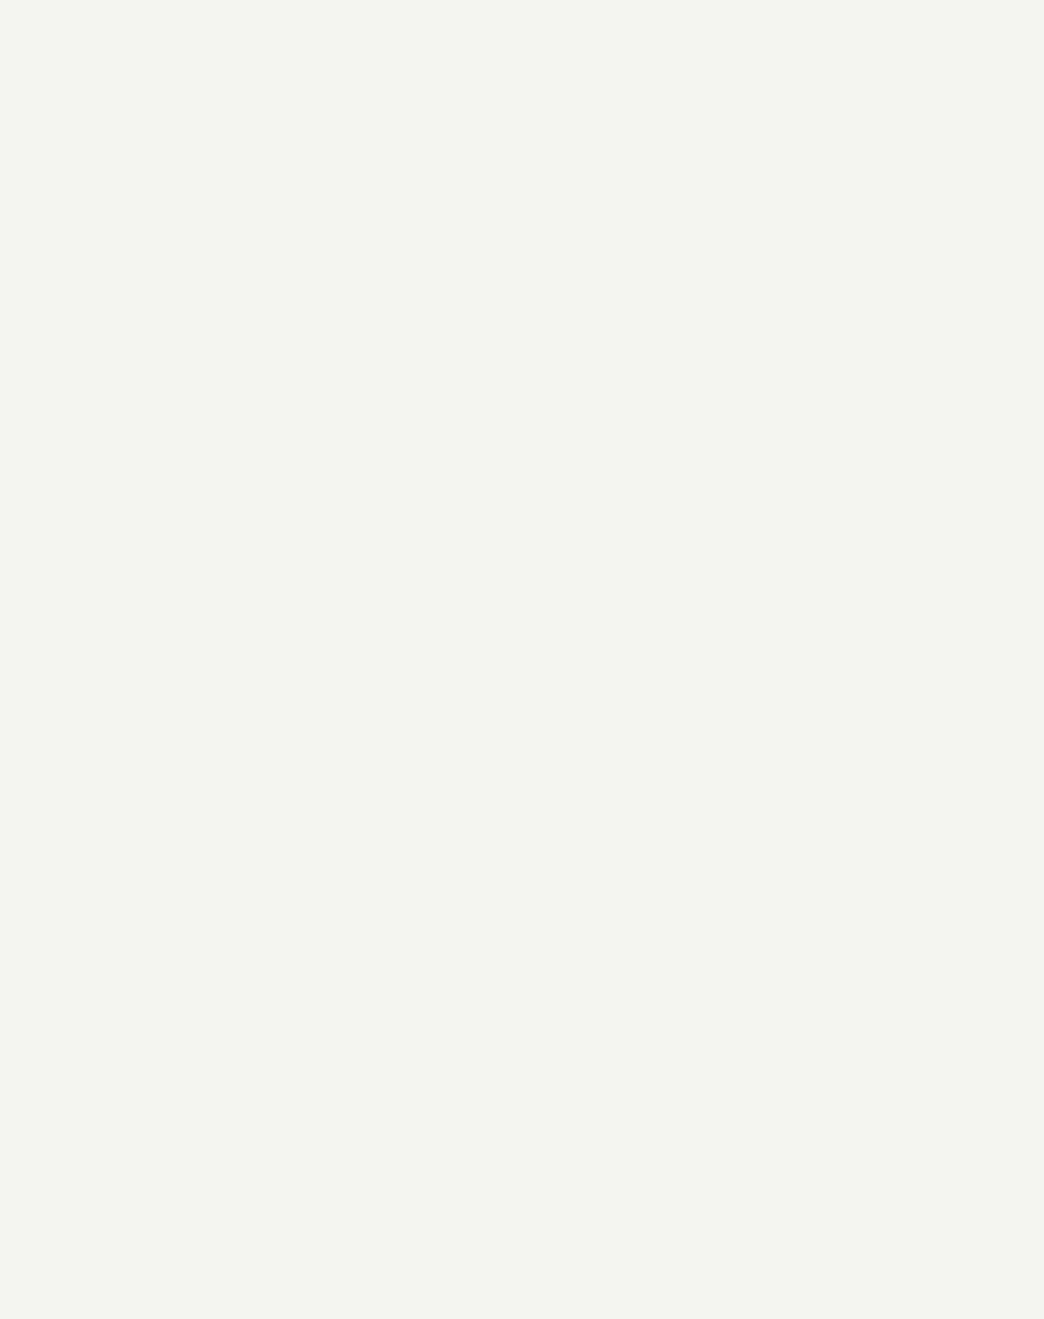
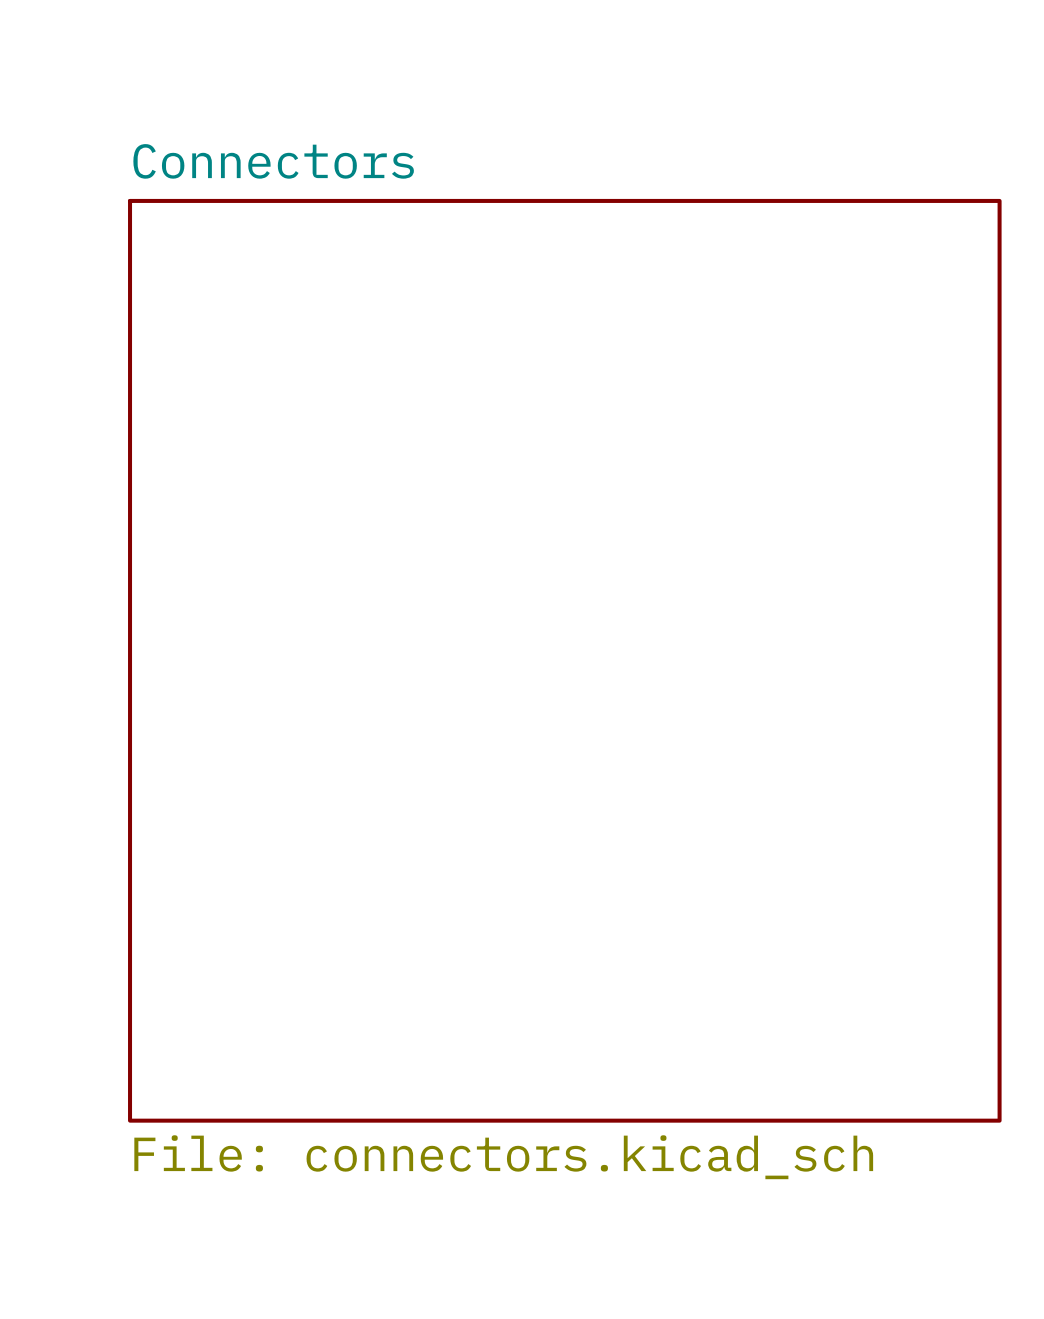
sheet Connectors: none -> File: connectors.kicad_sch (564, 660)

